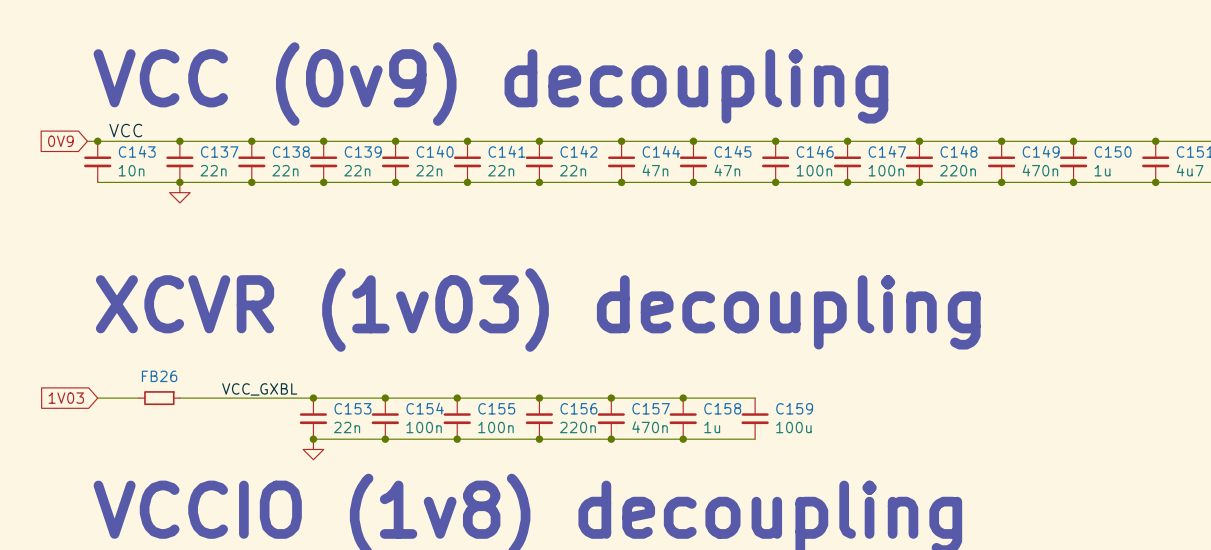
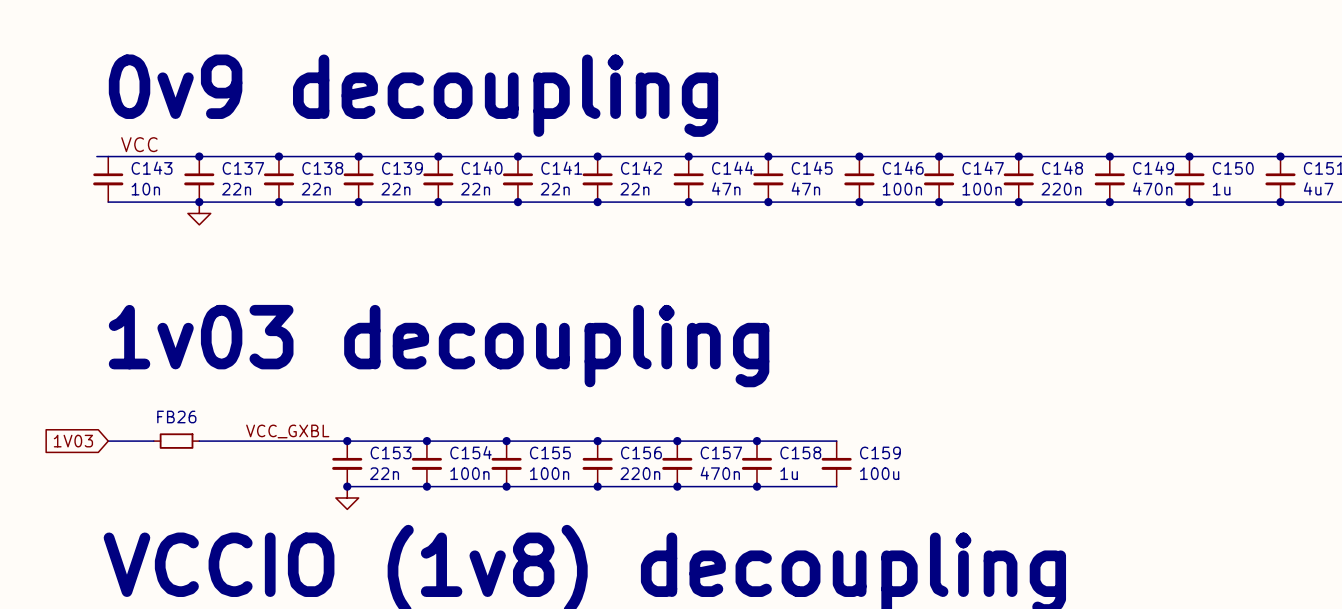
text: VCC (0v9) decoupling (490, 84) -> 0v9 decoupling (413, 95)
global label: 0V9 (60, 141) -> none
junction: (97, 141) -> none
text: XCVR (1v03) decoupling (538, 310) -> 1v03 decoupling (439, 346)

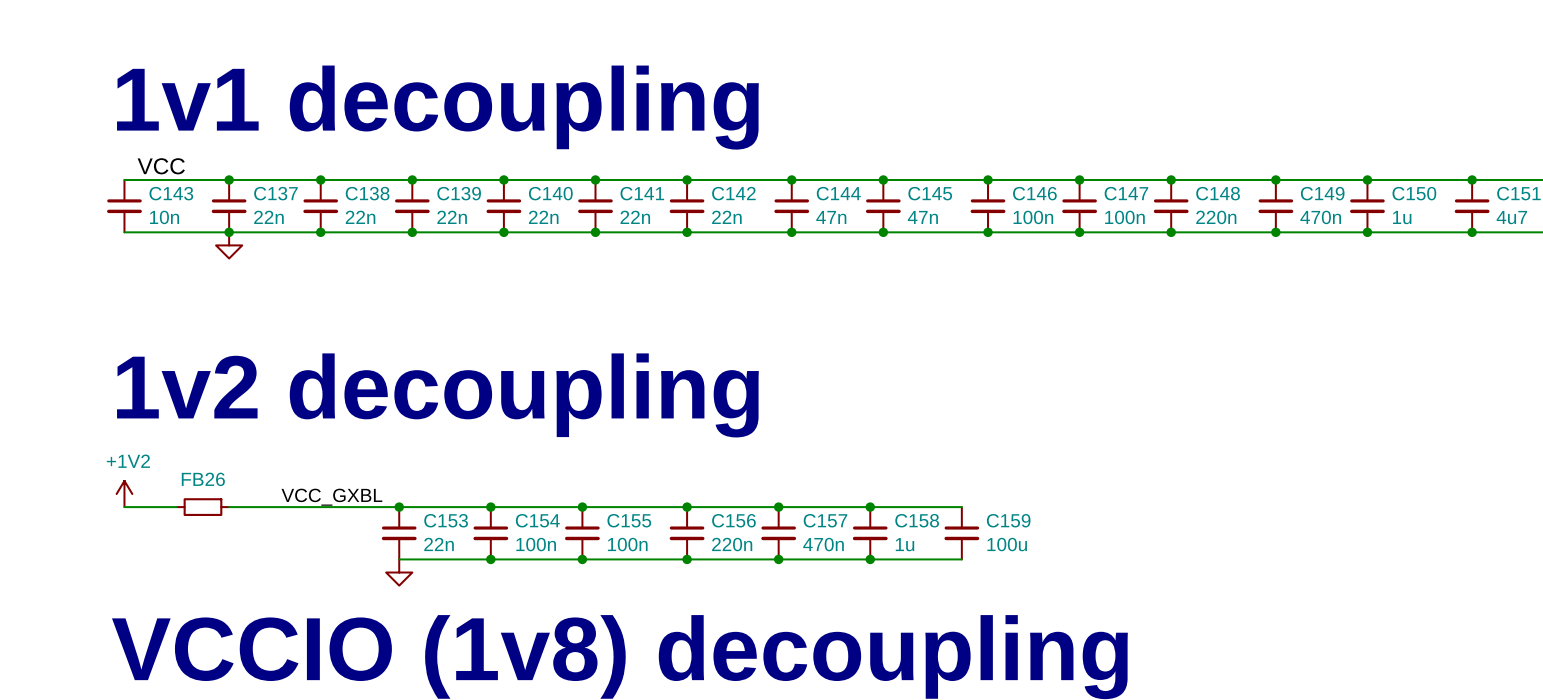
text: 0v9 decoupling (413, 95) -> 1v1 decoupling (437, 107)
wire: (96, 156) (108, 156) -> none
text: 1v03 decoupling (439, 346) -> 1v2 decoupling (437, 395)
power symbol: none -> +1V2 (124, 494)
global label: 1V03 (73, 441) -> none
junction: (347, 486) -> none

